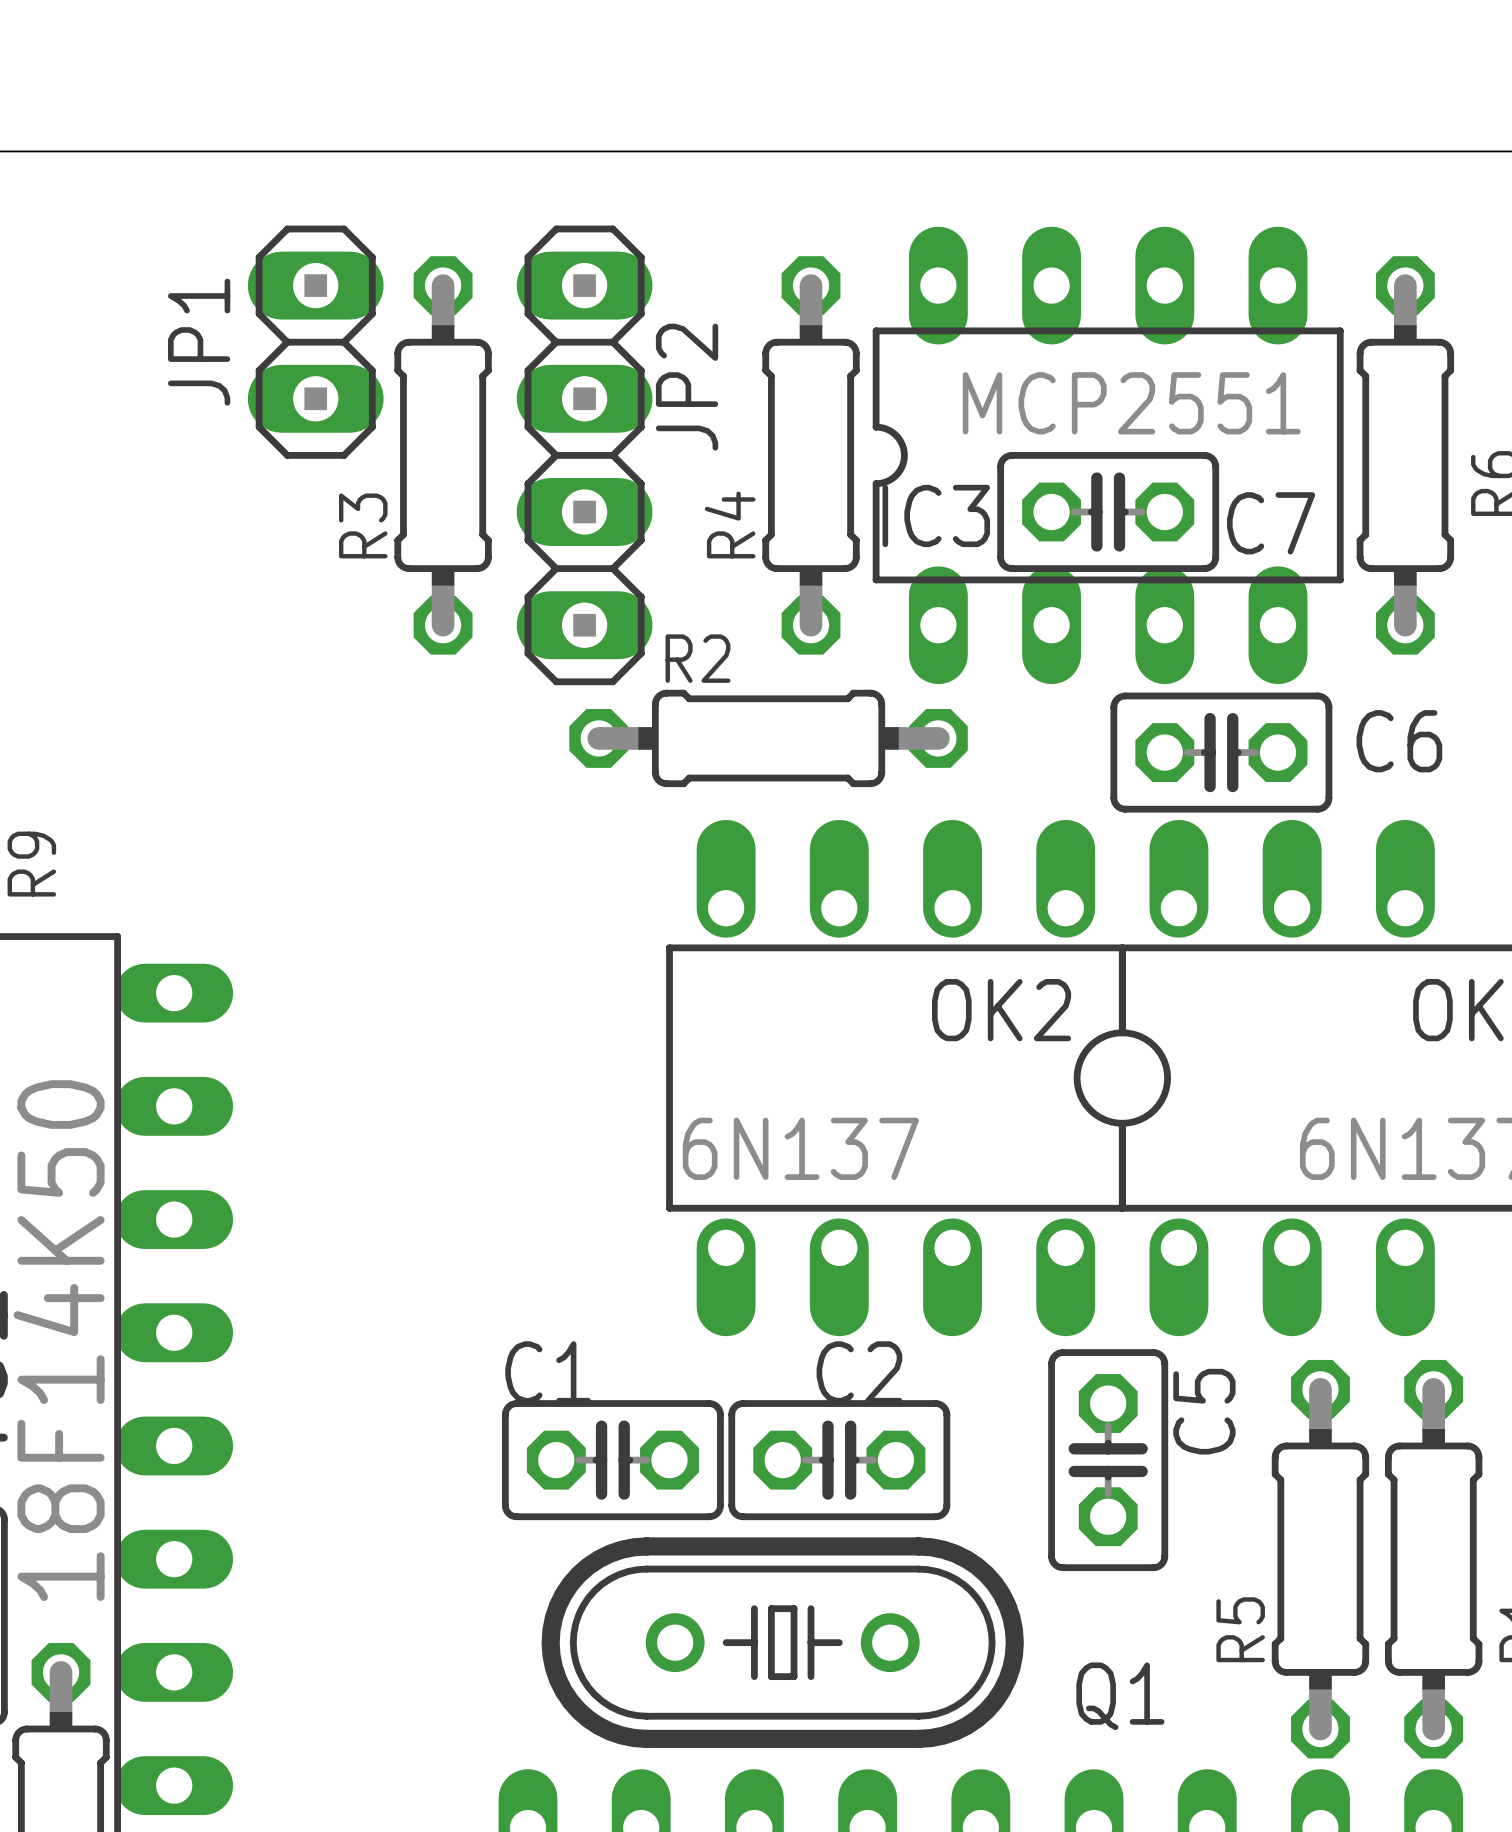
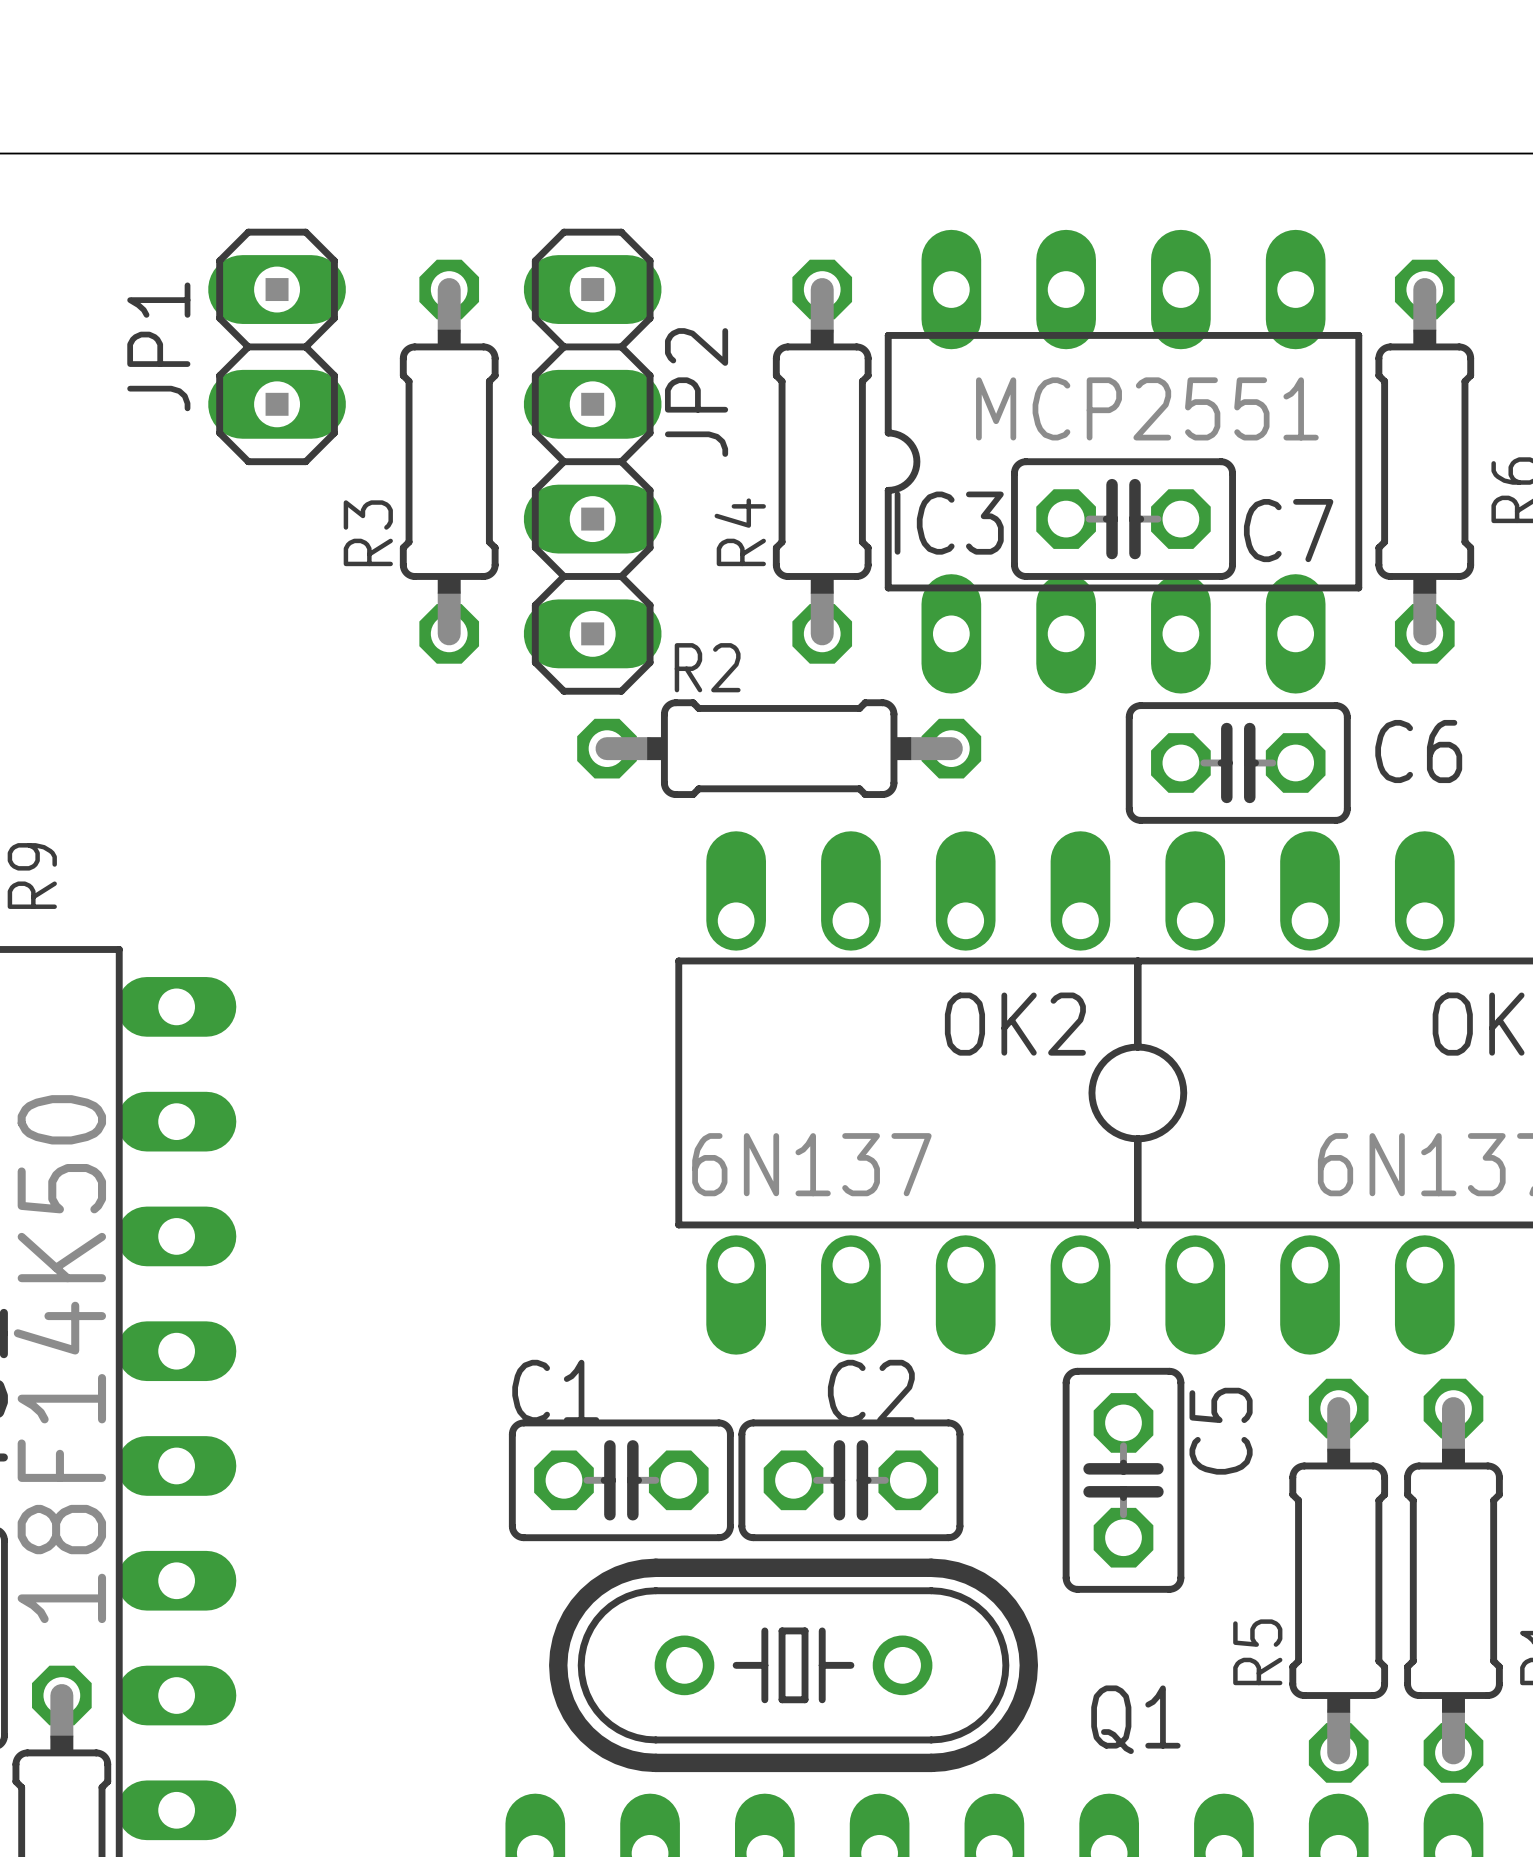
JP1 position: (315, 342) -> (277, 346)

